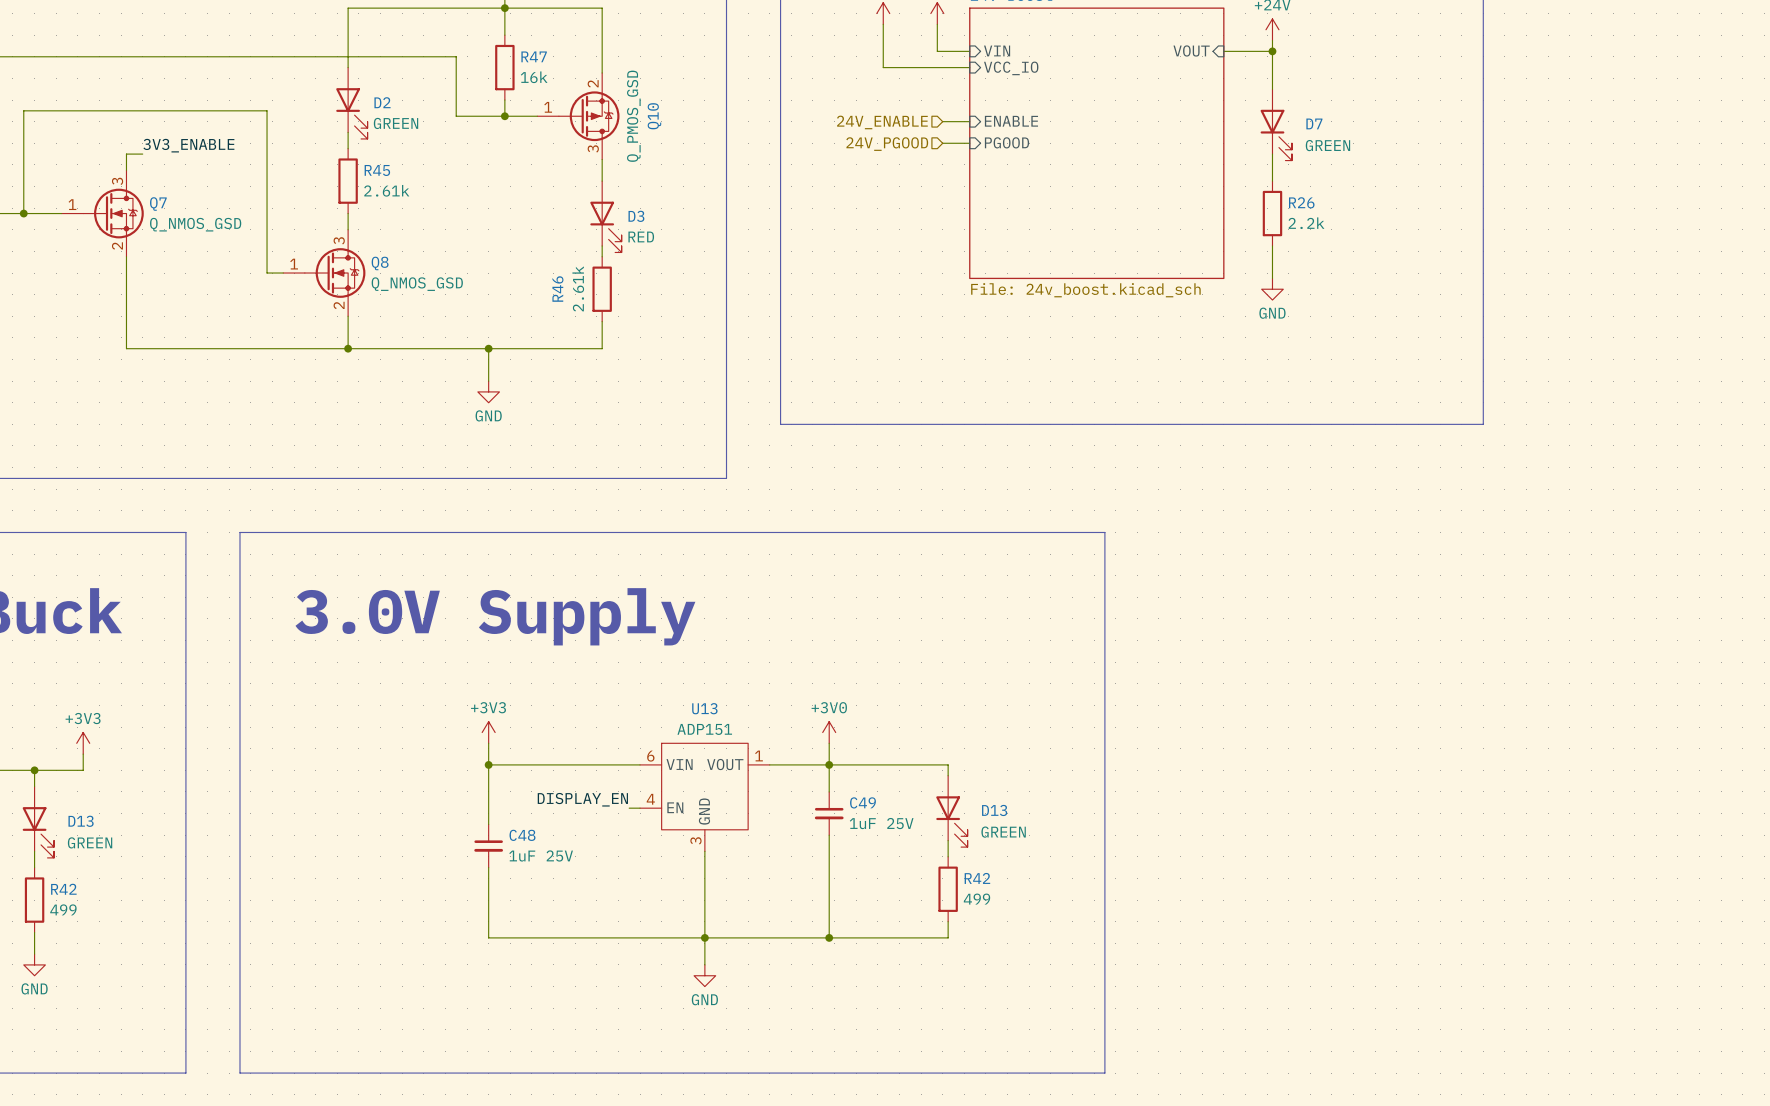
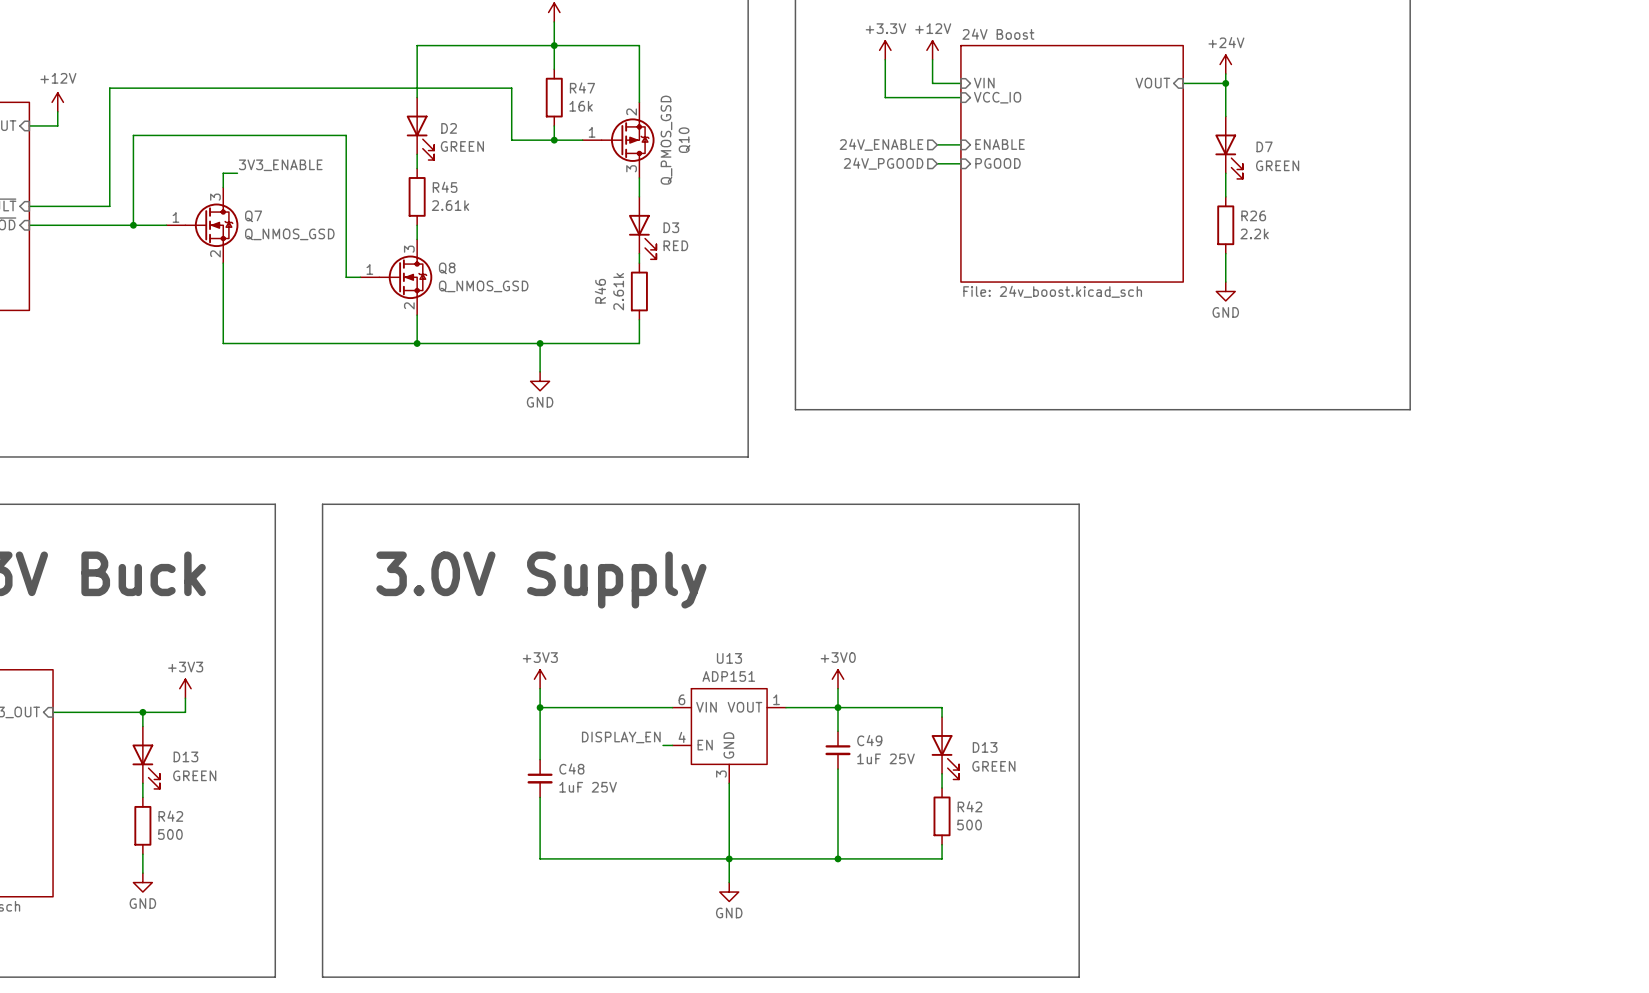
R42 value: 499 (976, 899) -> 500 (969, 825)
R42 value: 499 (63, 909) -> 500 (170, 834)

